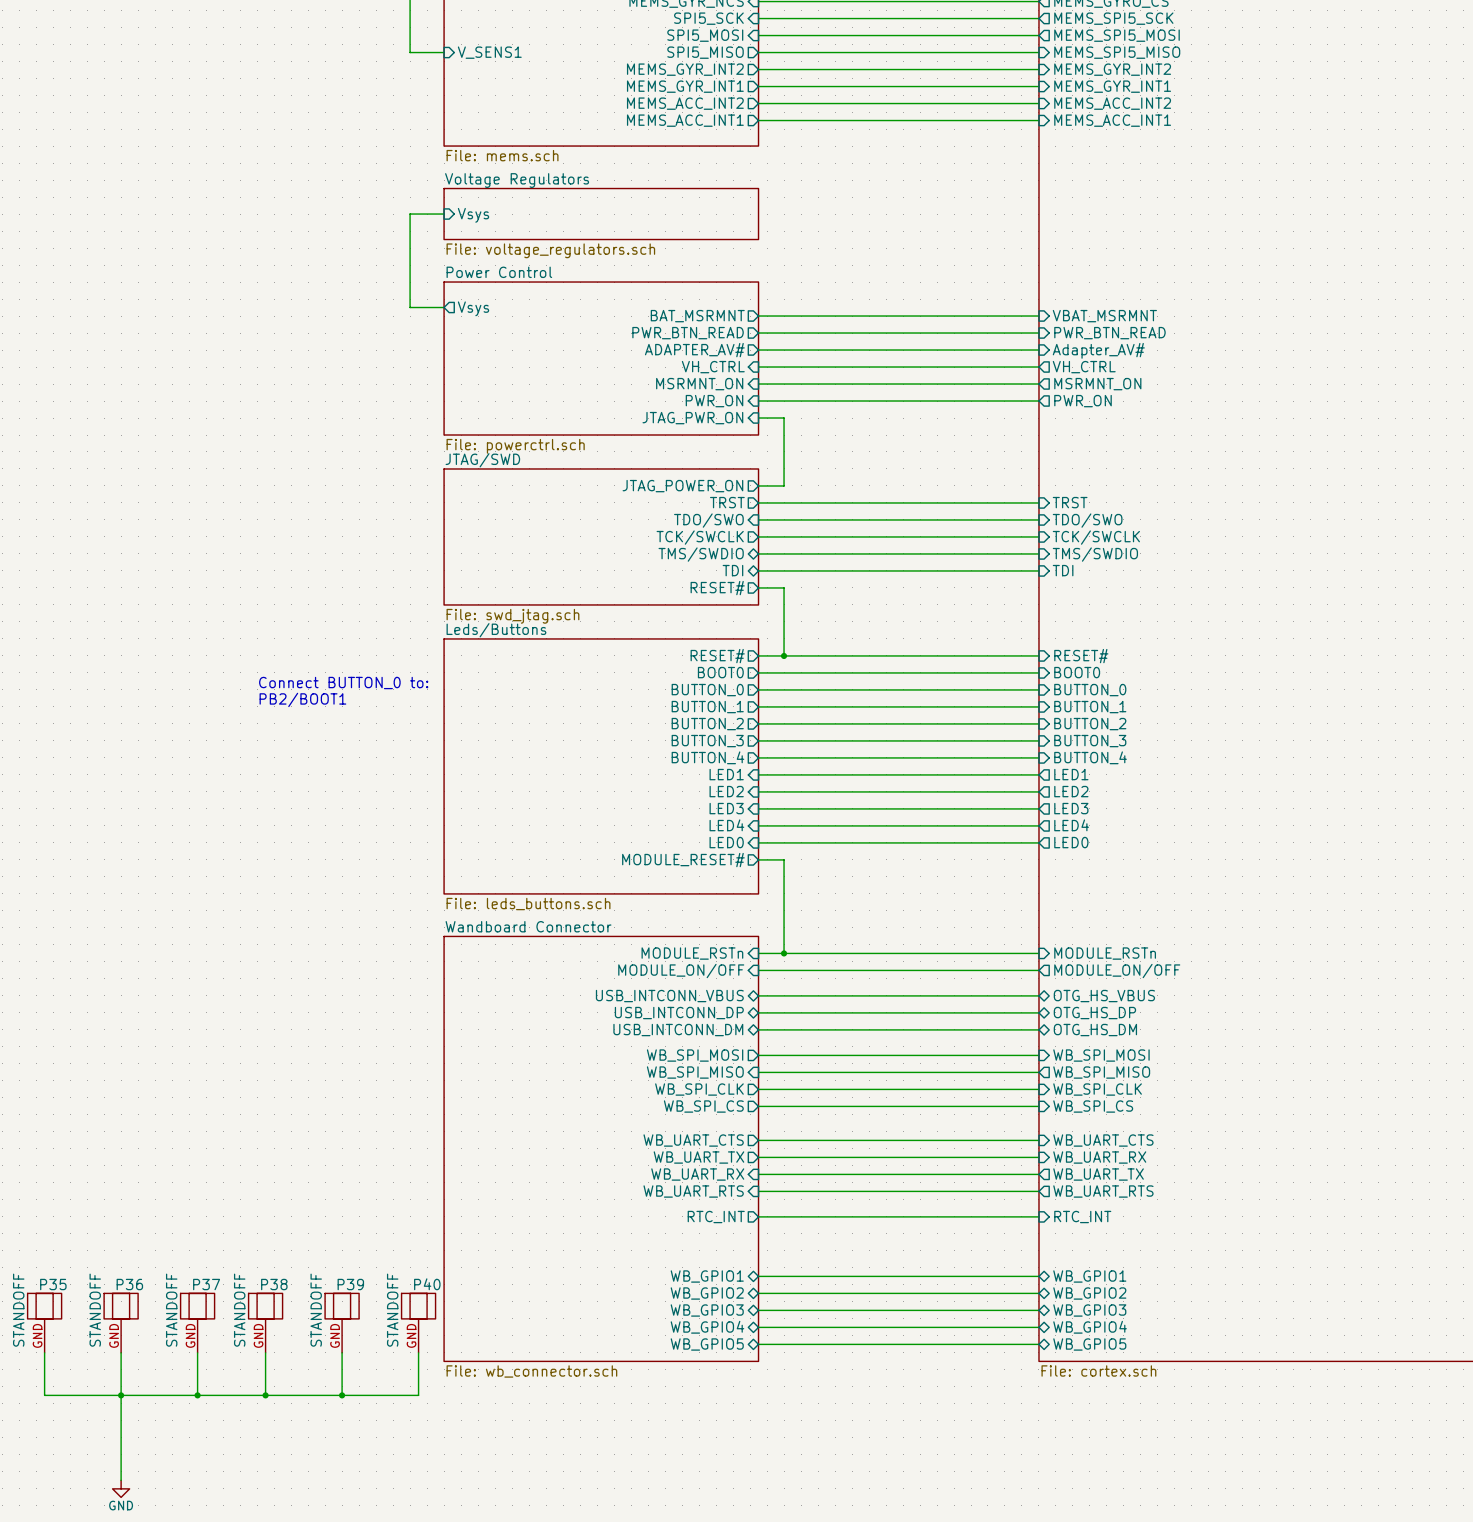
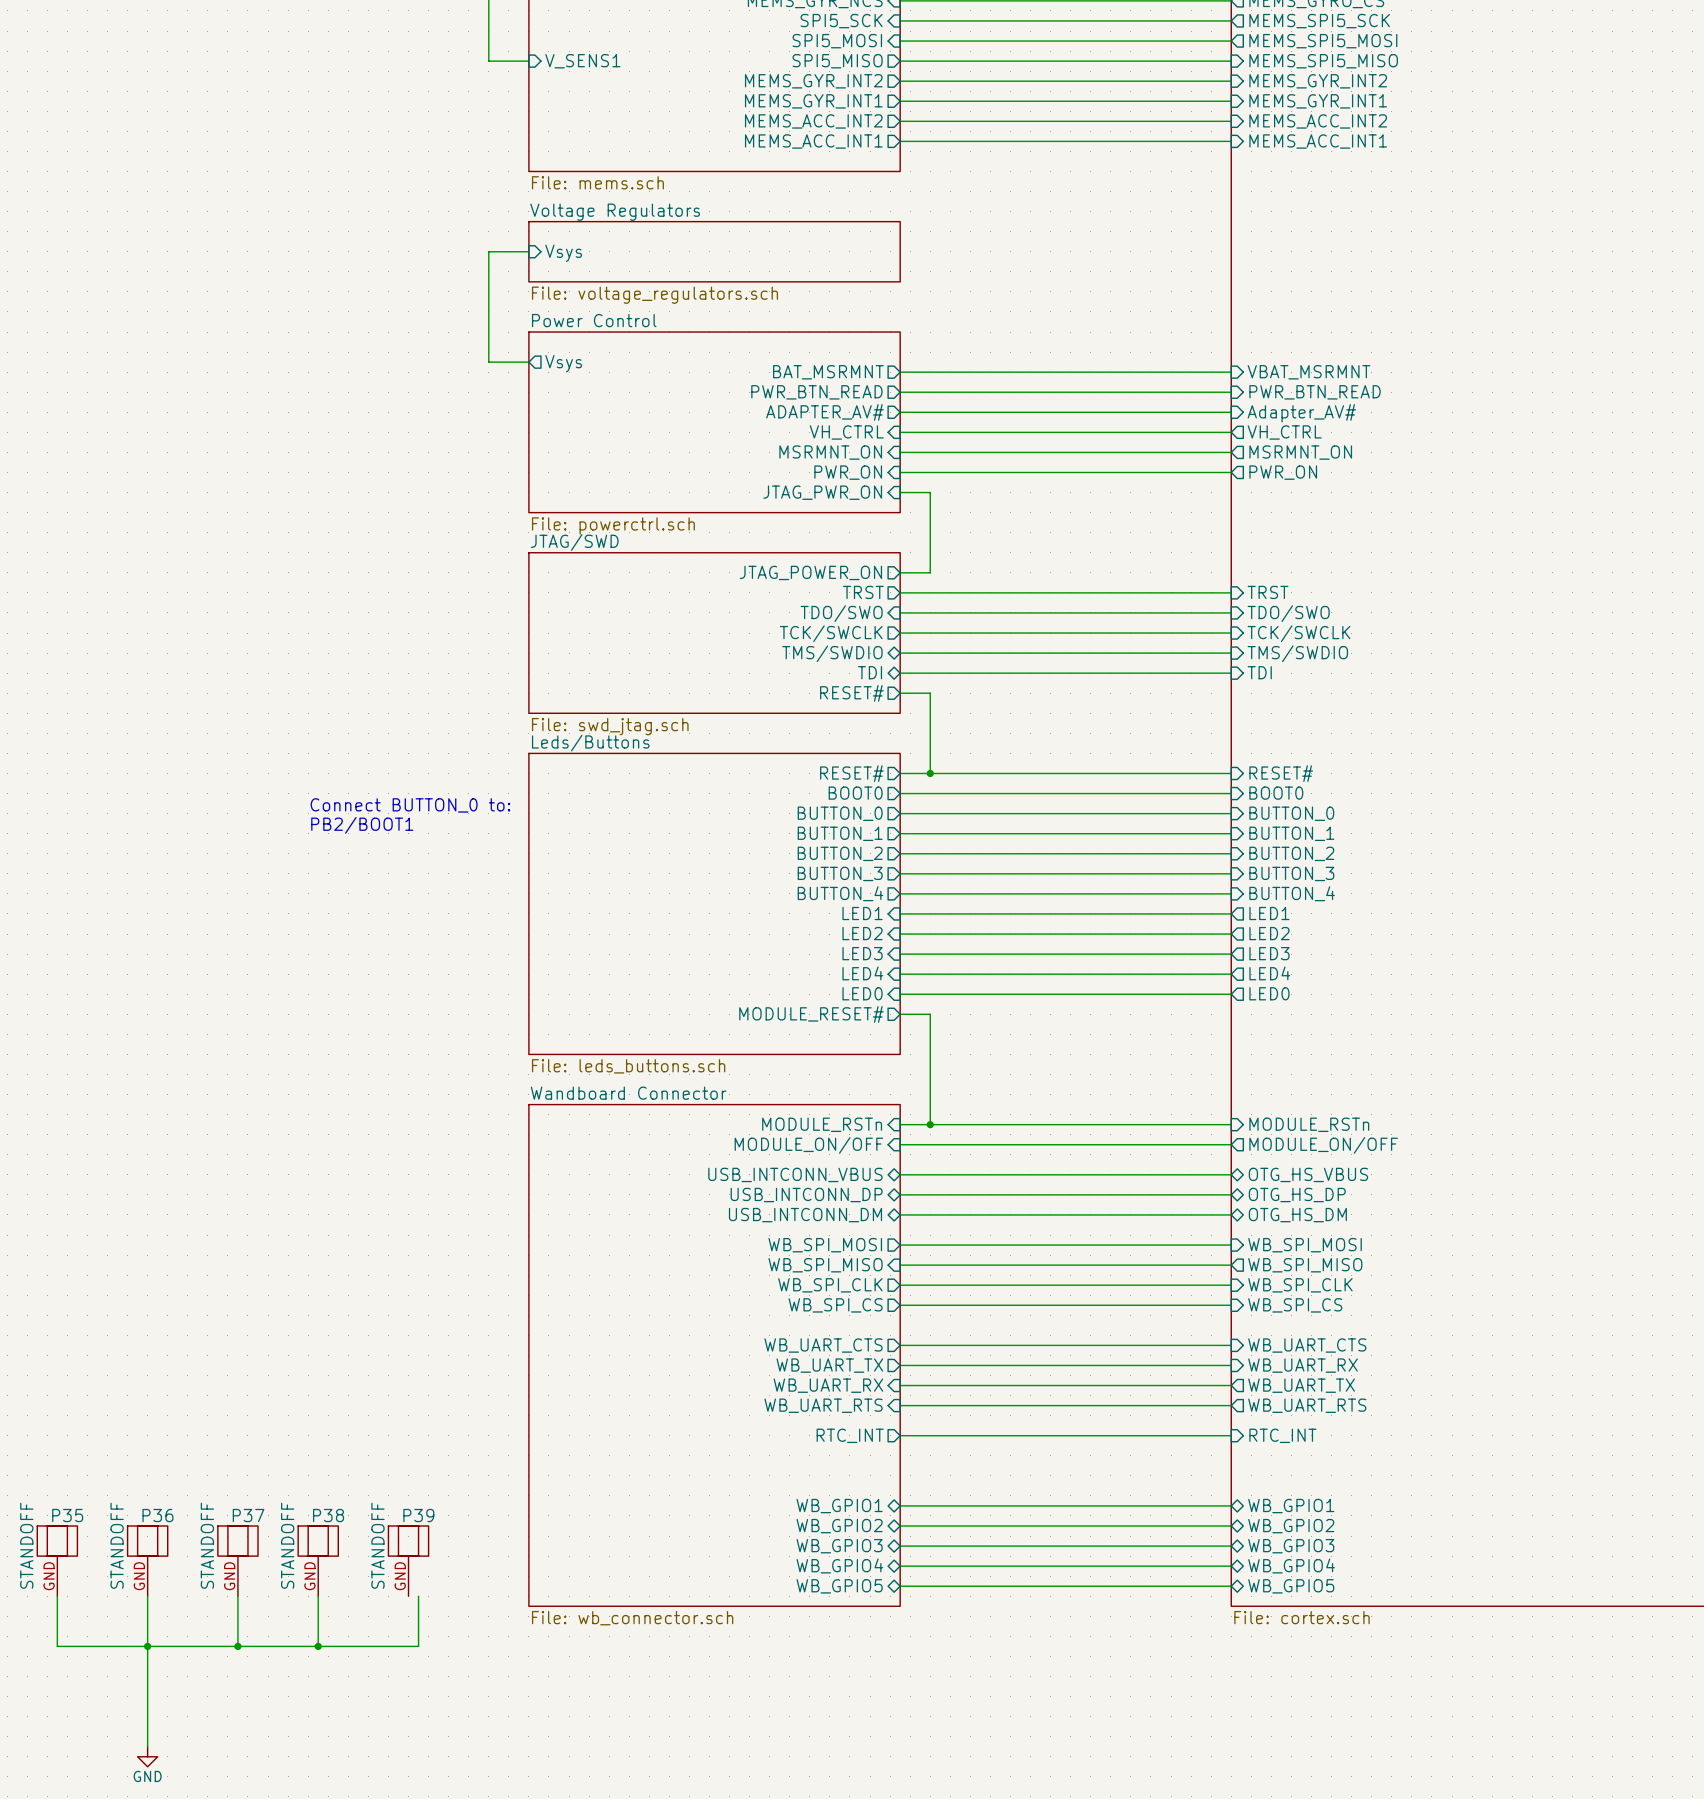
P40: STANDOFF (418, 1323) -> none
wire: (342, 1352) (342, 1395) -> none
wire: (418, 1352) (418, 1395) (350, 1395) -> (418, 1596) (418, 1646)
junction: (342, 1395) -> none

